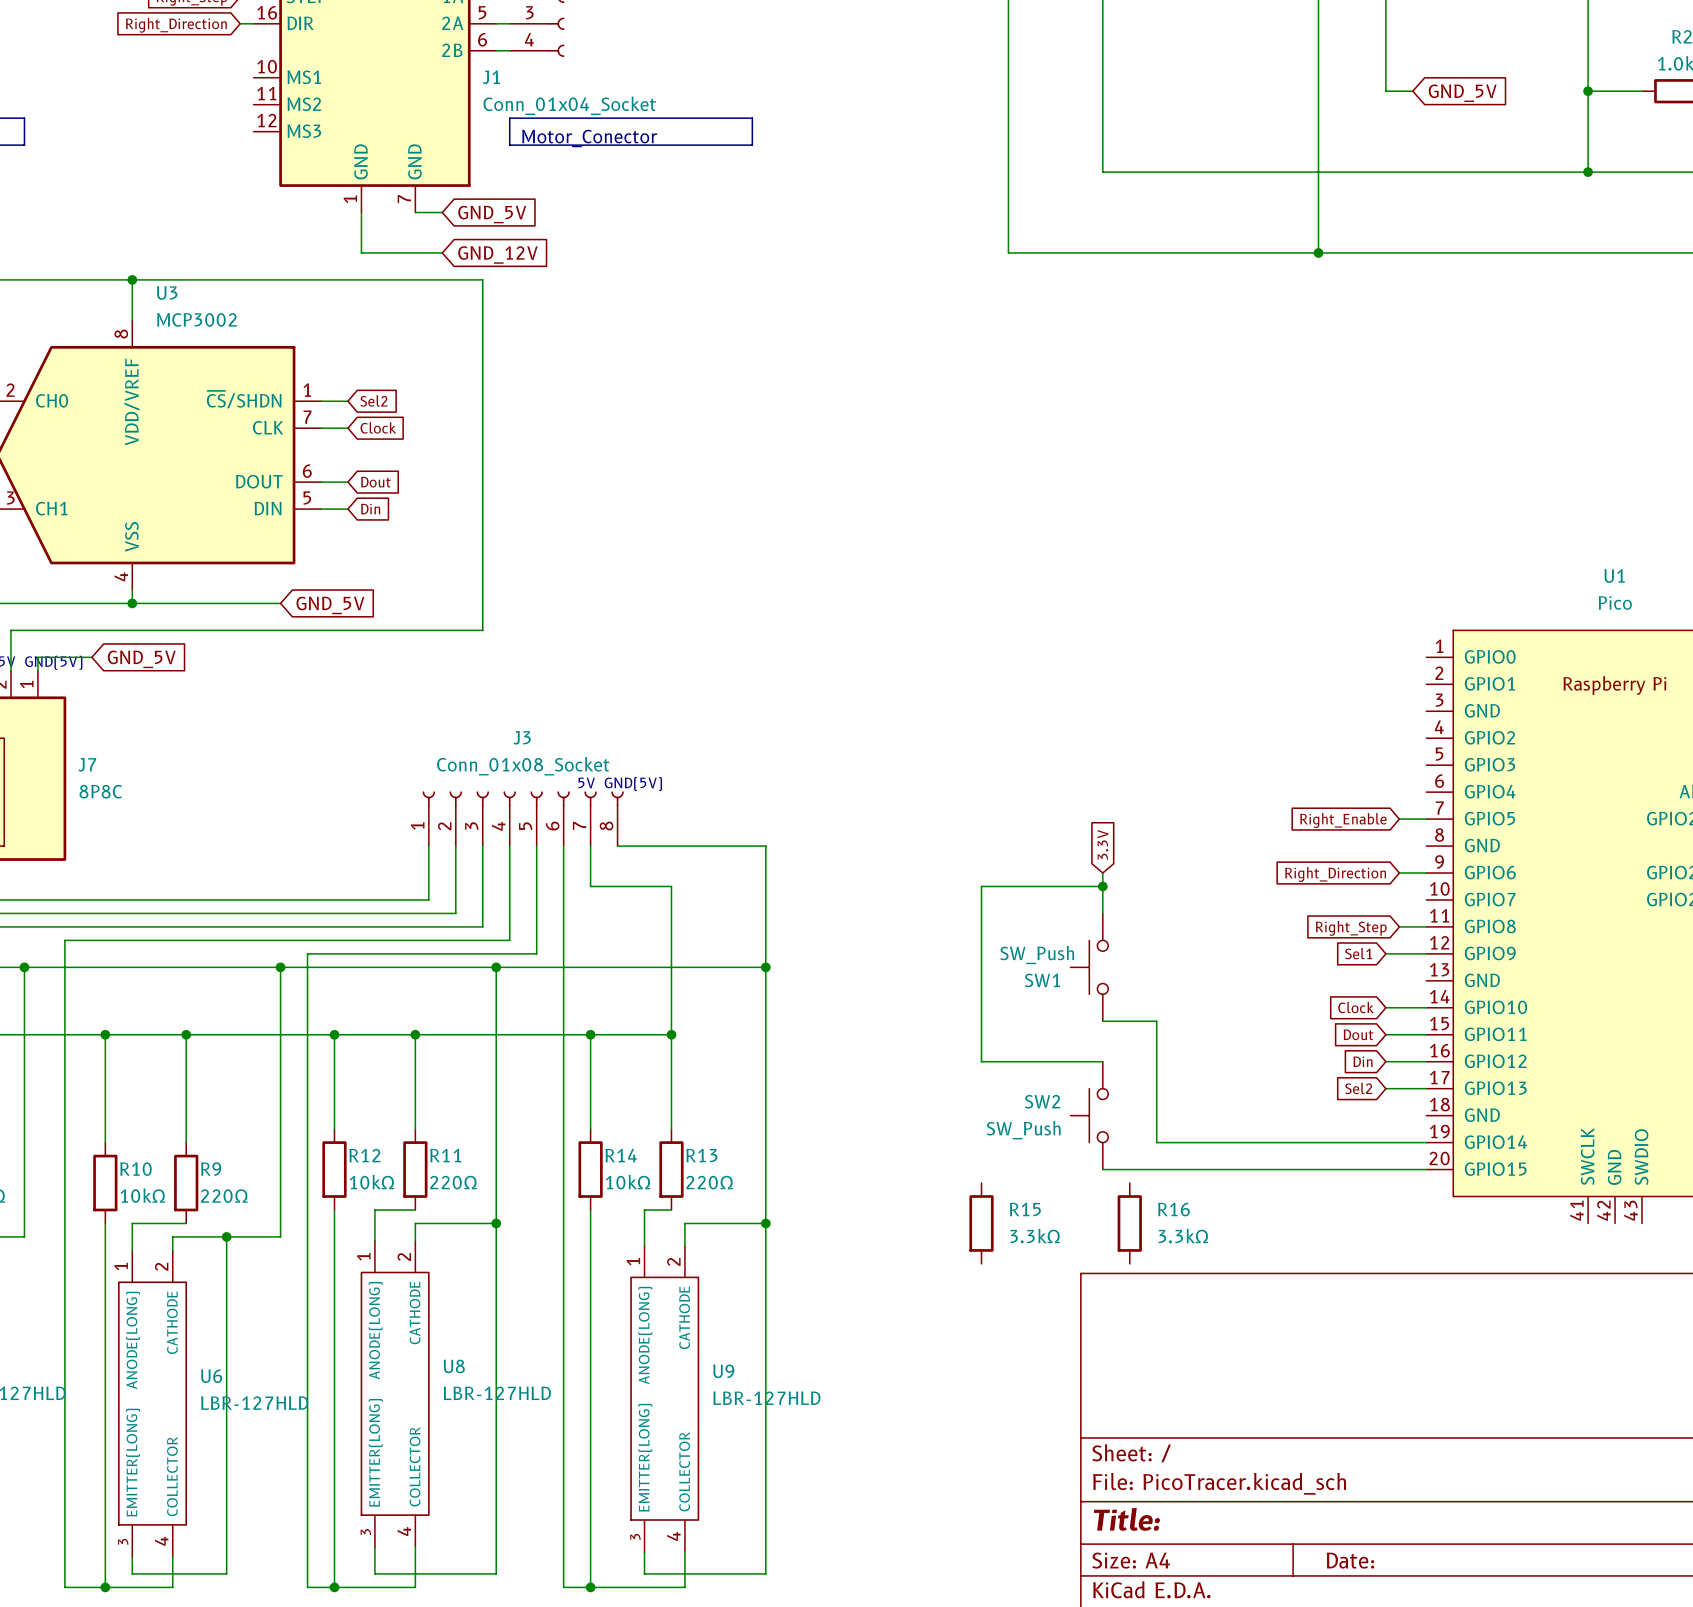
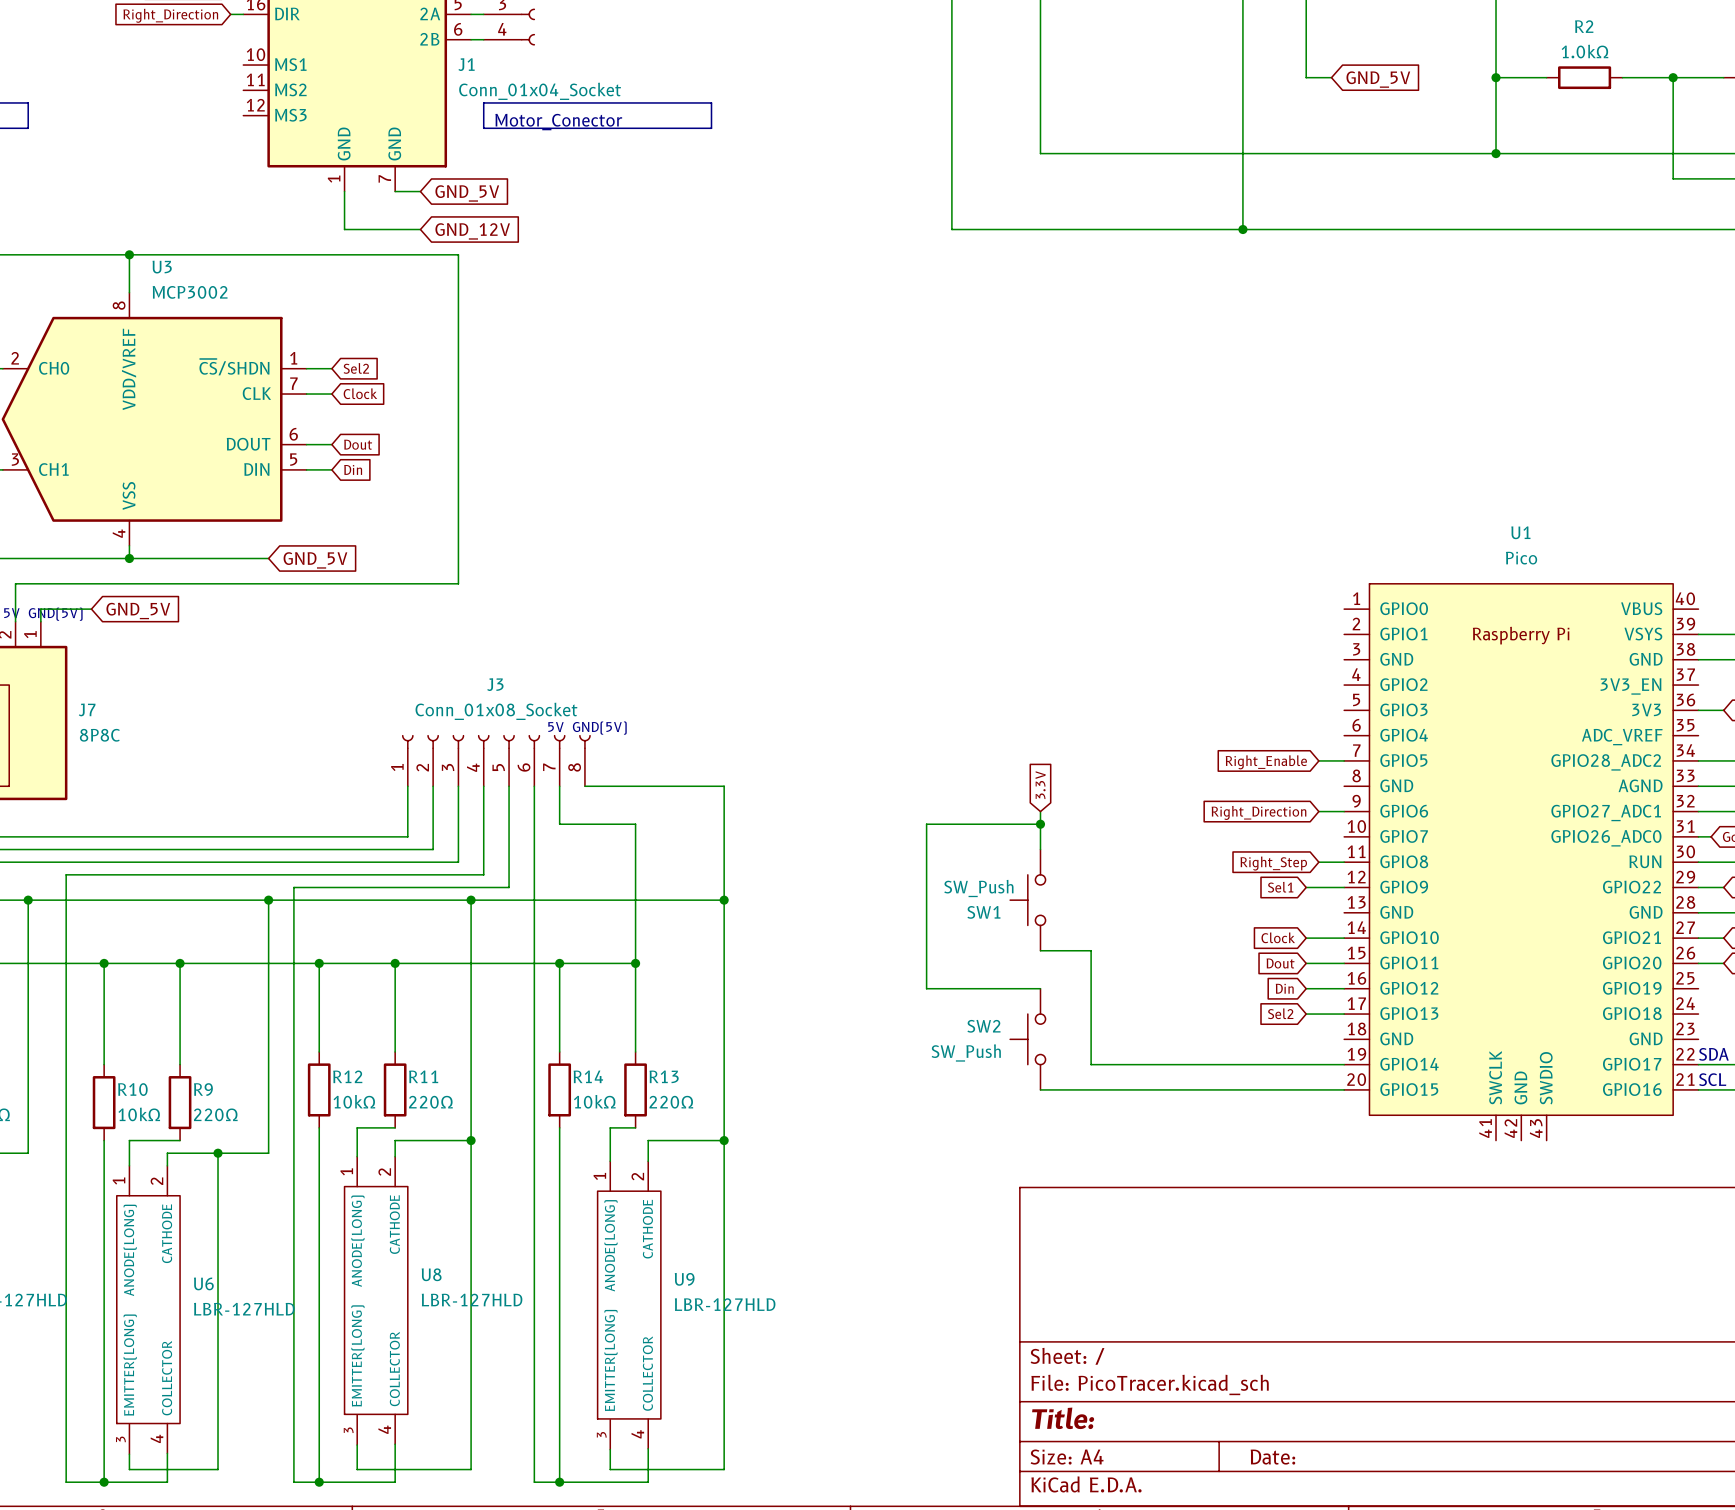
R15: 3.3kΩ (981, 1223) -> none
R16: 3.3kΩ (1129, 1223) -> none

